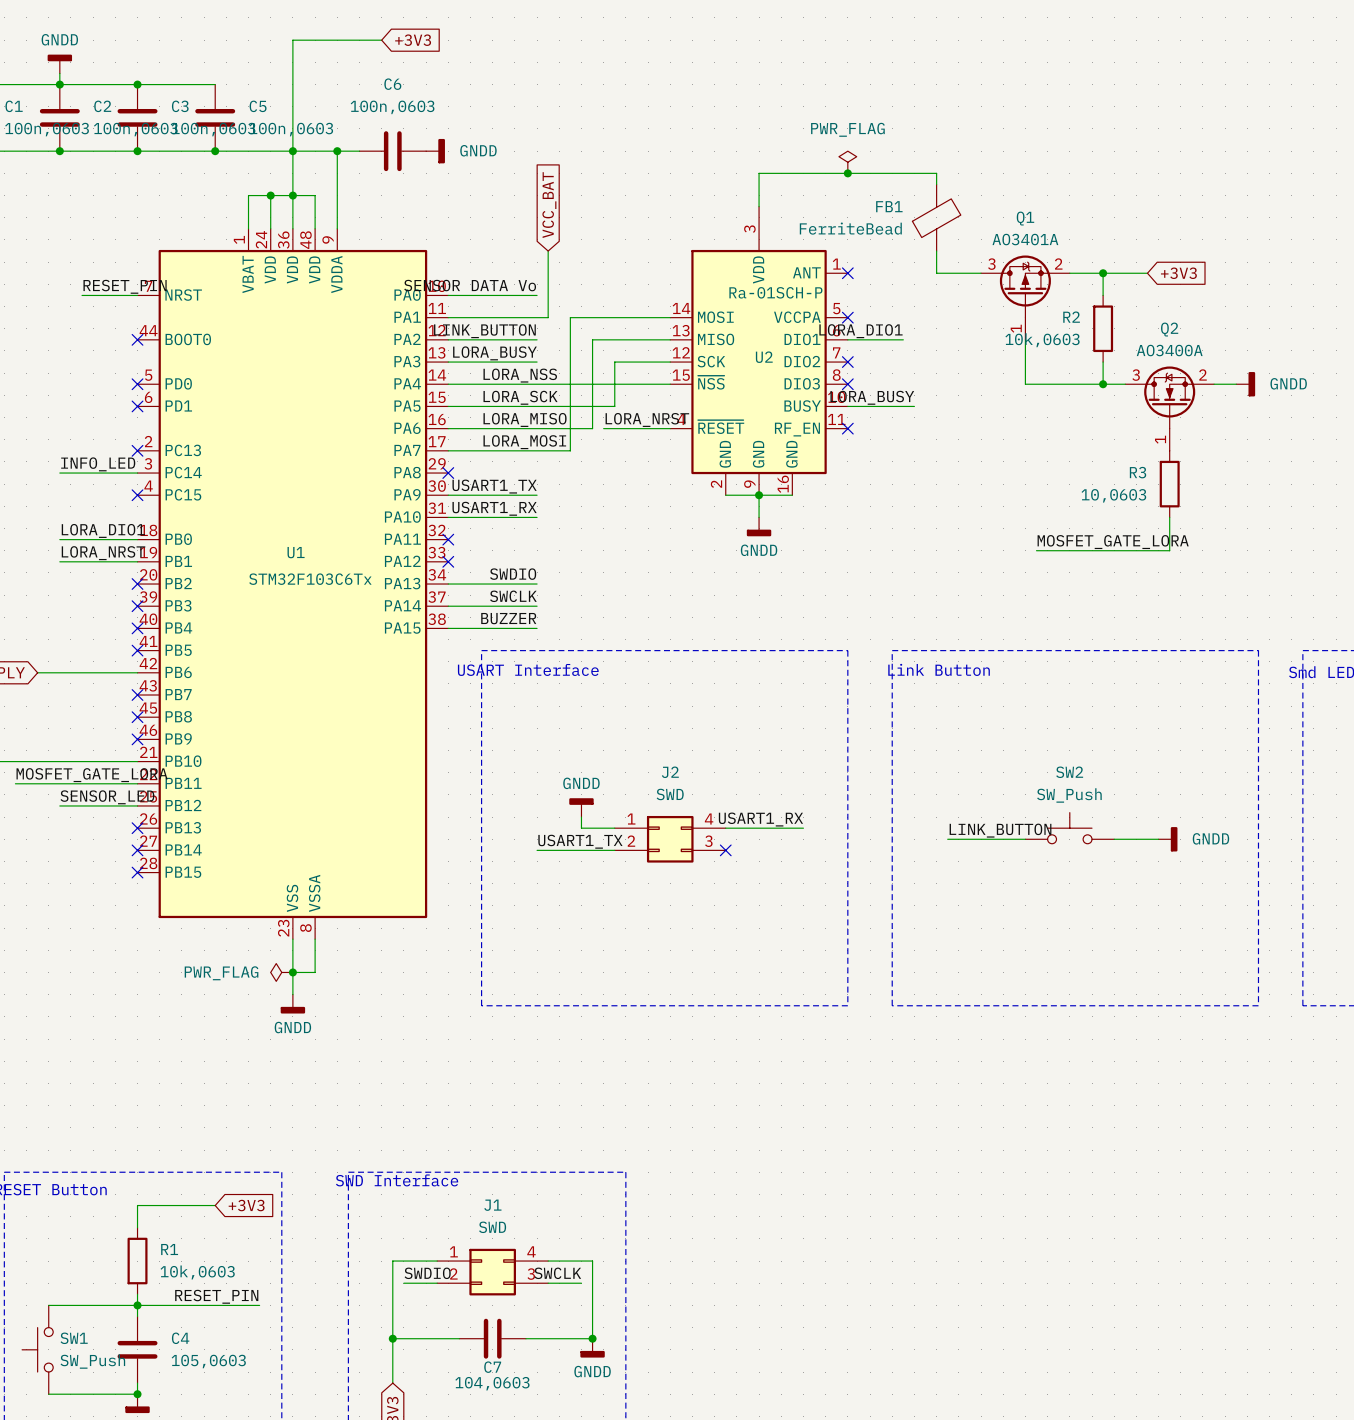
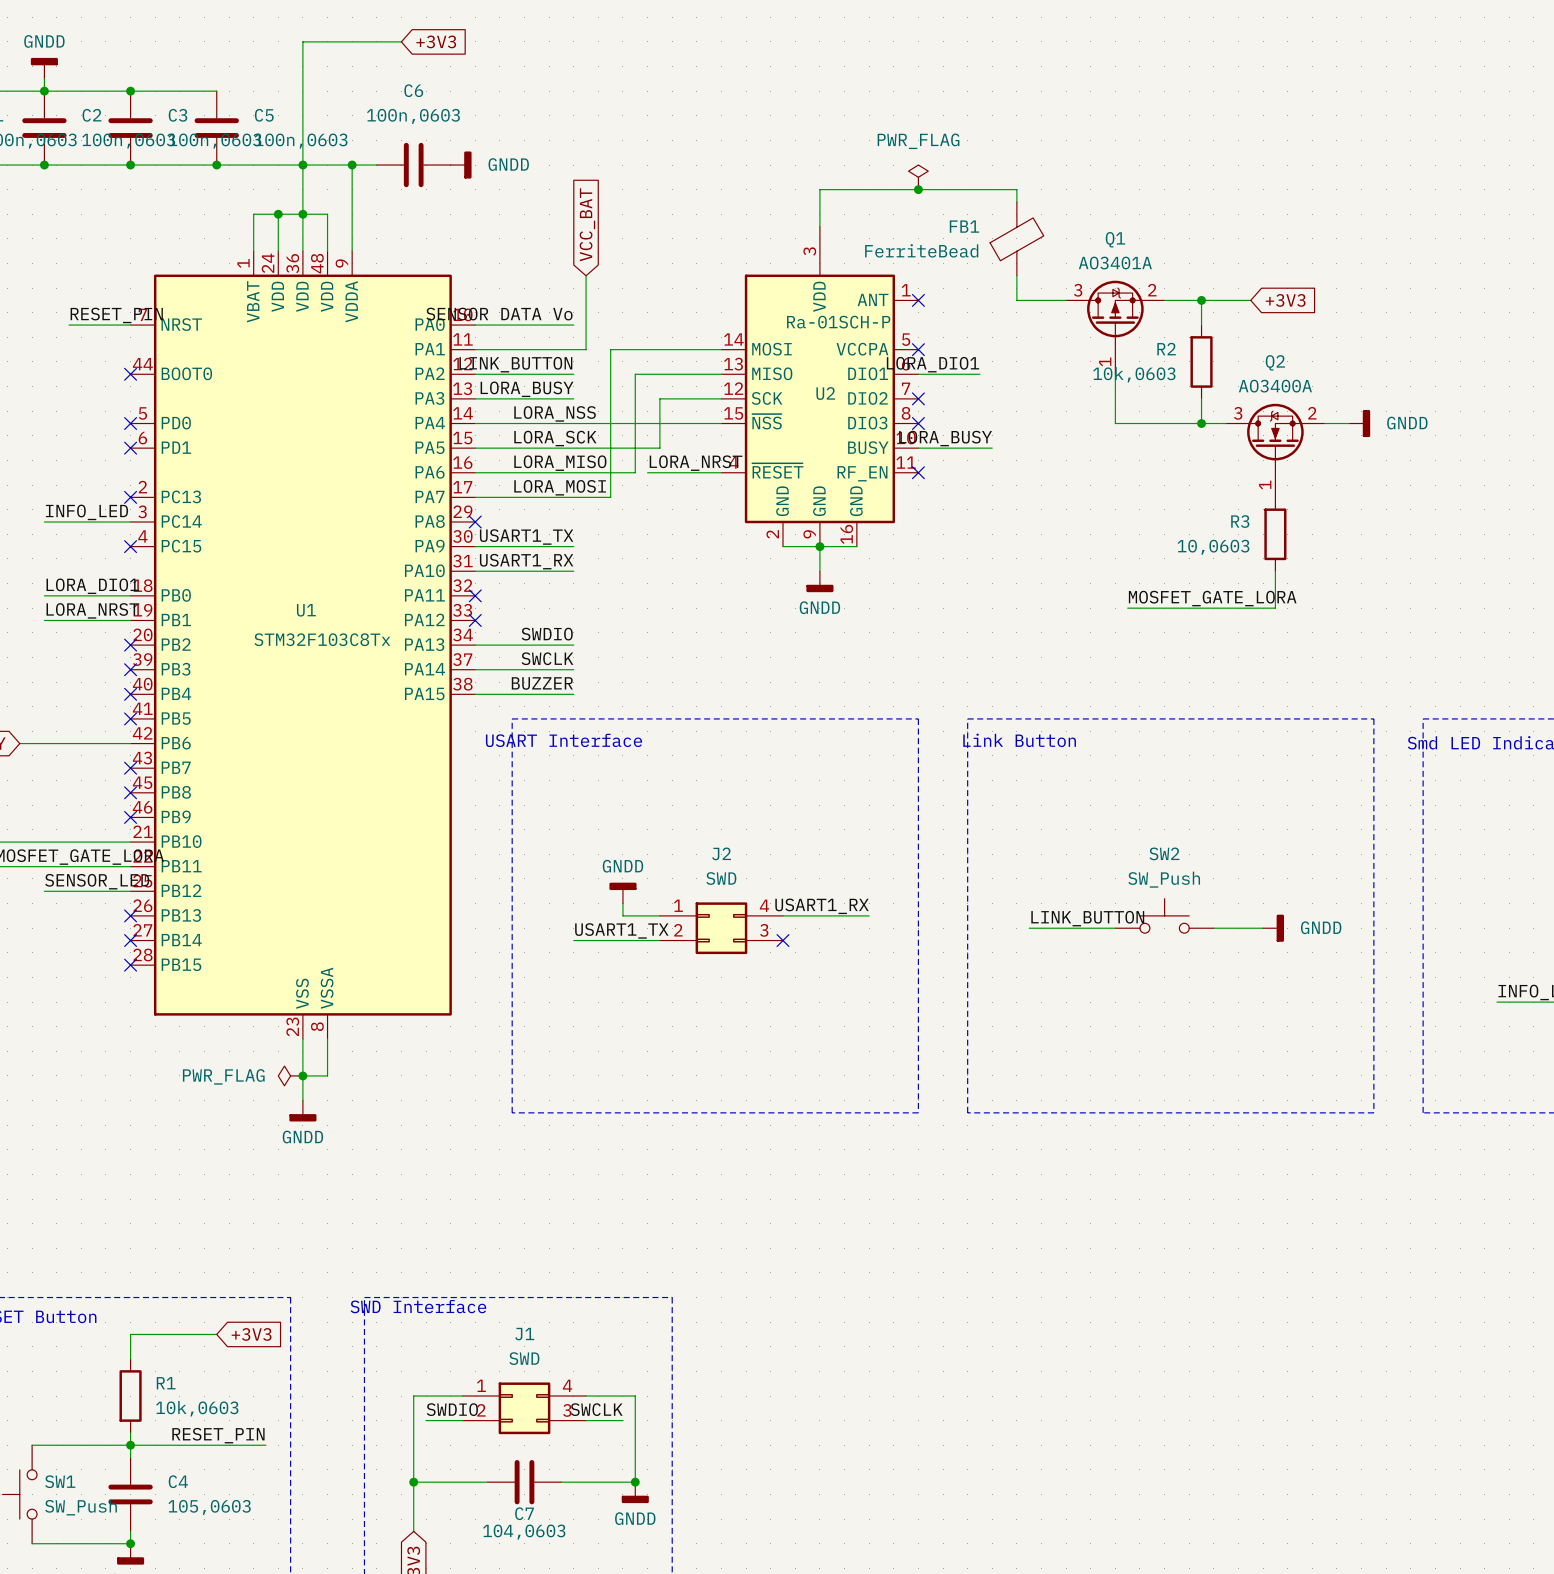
U1 value: STM32F103C6Tx (310, 579) -> STM32F103C8Tx (322, 639)

